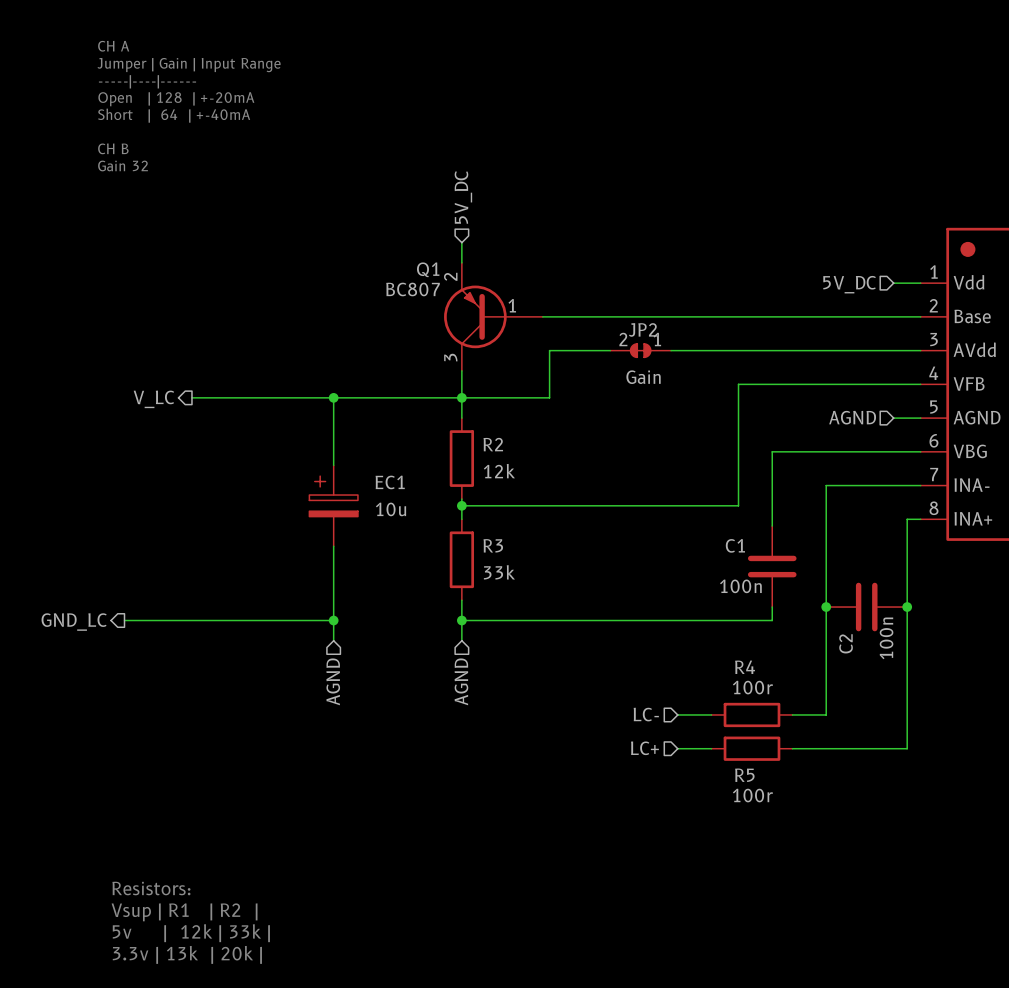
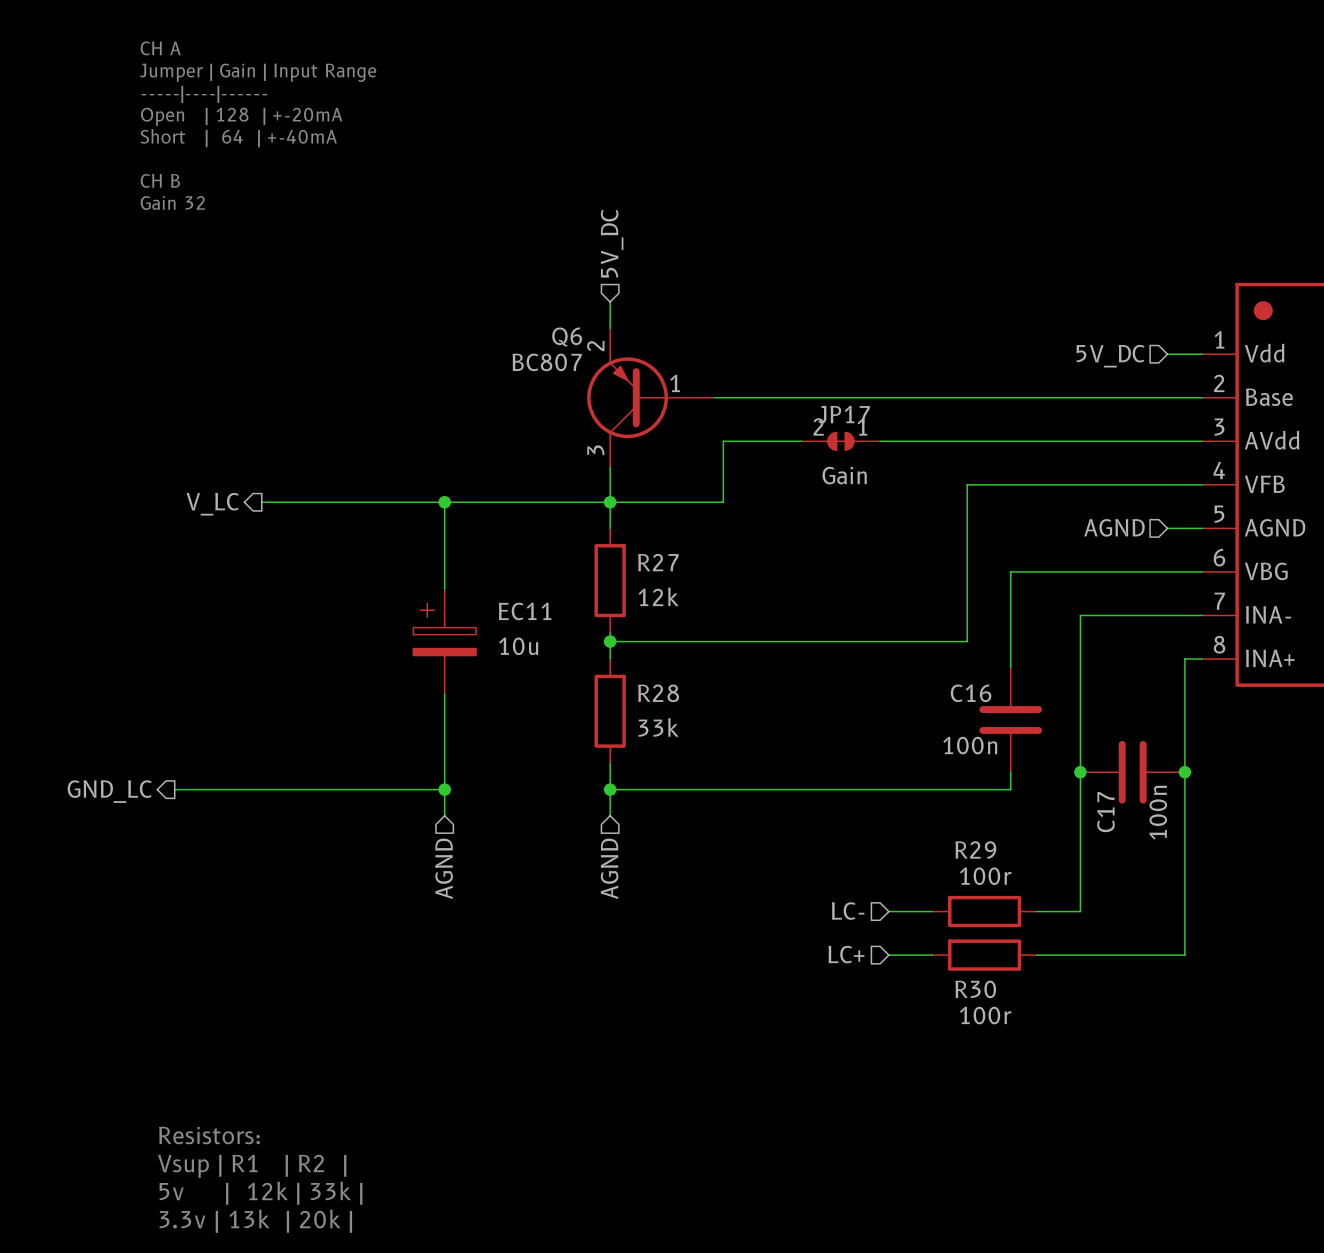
Q1 name: Q1 (428, 269) -> Q6 (567, 337)
JP2 name: JP2 (642, 329) -> JP17 (844, 414)
R2 name: R2 (493, 444) -> R27 (658, 562)
EC1 name: EC1 (390, 482) -> EC11 (525, 611)
R3 name: R3 (493, 545) -> R28 (658, 693)
C1 name: C1 (735, 545) -> C16 (971, 693)
C2 name: C2 (846, 643) -> C17 (1105, 812)
R4 name: R4 (745, 667) -> R29 (975, 850)
R5 name: R5 (744, 775) -> R30 (975, 989)

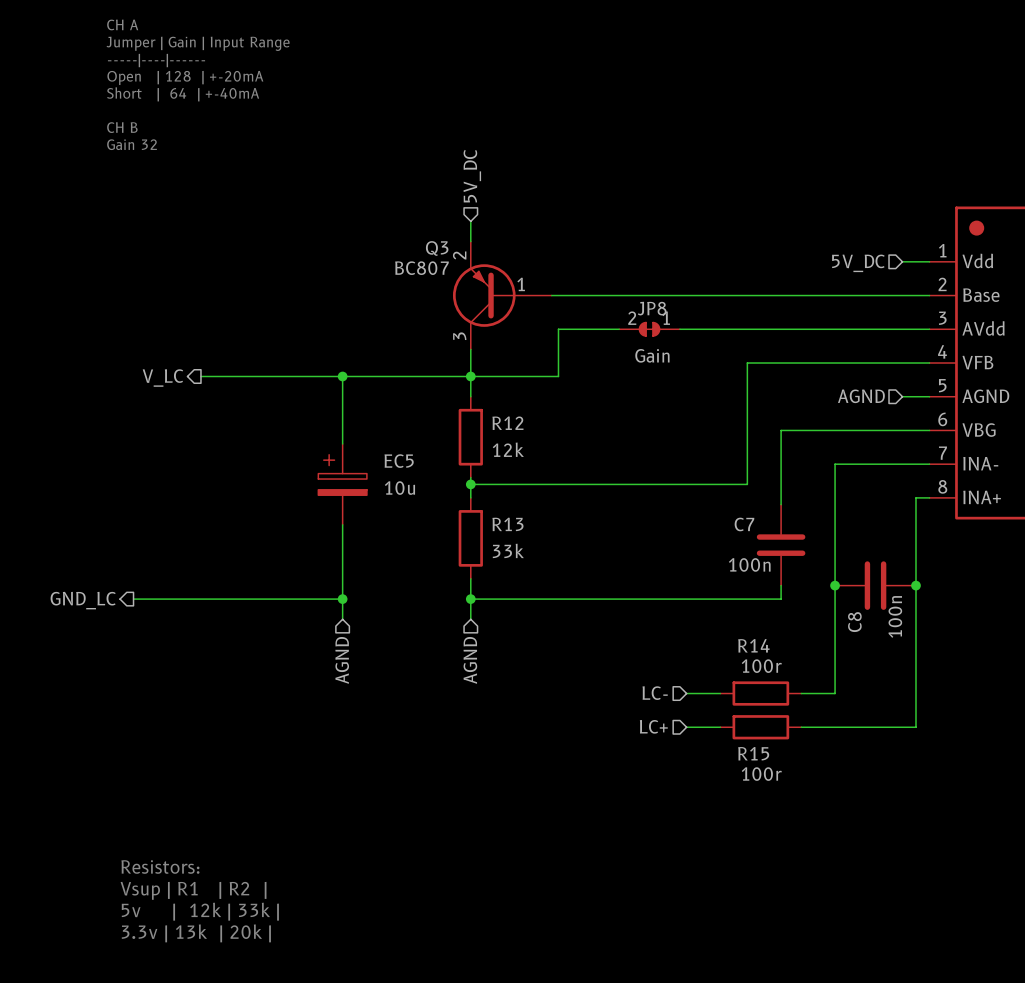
Q6 name: Q6 (567, 337) -> Q3 (437, 248)
JP17 name: JP17 (844, 414) -> JP8 (652, 308)
R27 name: R27 (658, 562) -> R12 (507, 423)
EC11 name: EC11 (525, 611) -> EC5 (399, 461)
R28 name: R28 (658, 693) -> R13 (507, 524)
C16 name: C16 (971, 693) -> C7 (744, 524)
C17 name: C17 (1105, 812) -> C8 (854, 622)
R29 name: R29 (975, 850) -> R14 (753, 645)
R30 name: R30 (975, 989) -> R15 (753, 753)

